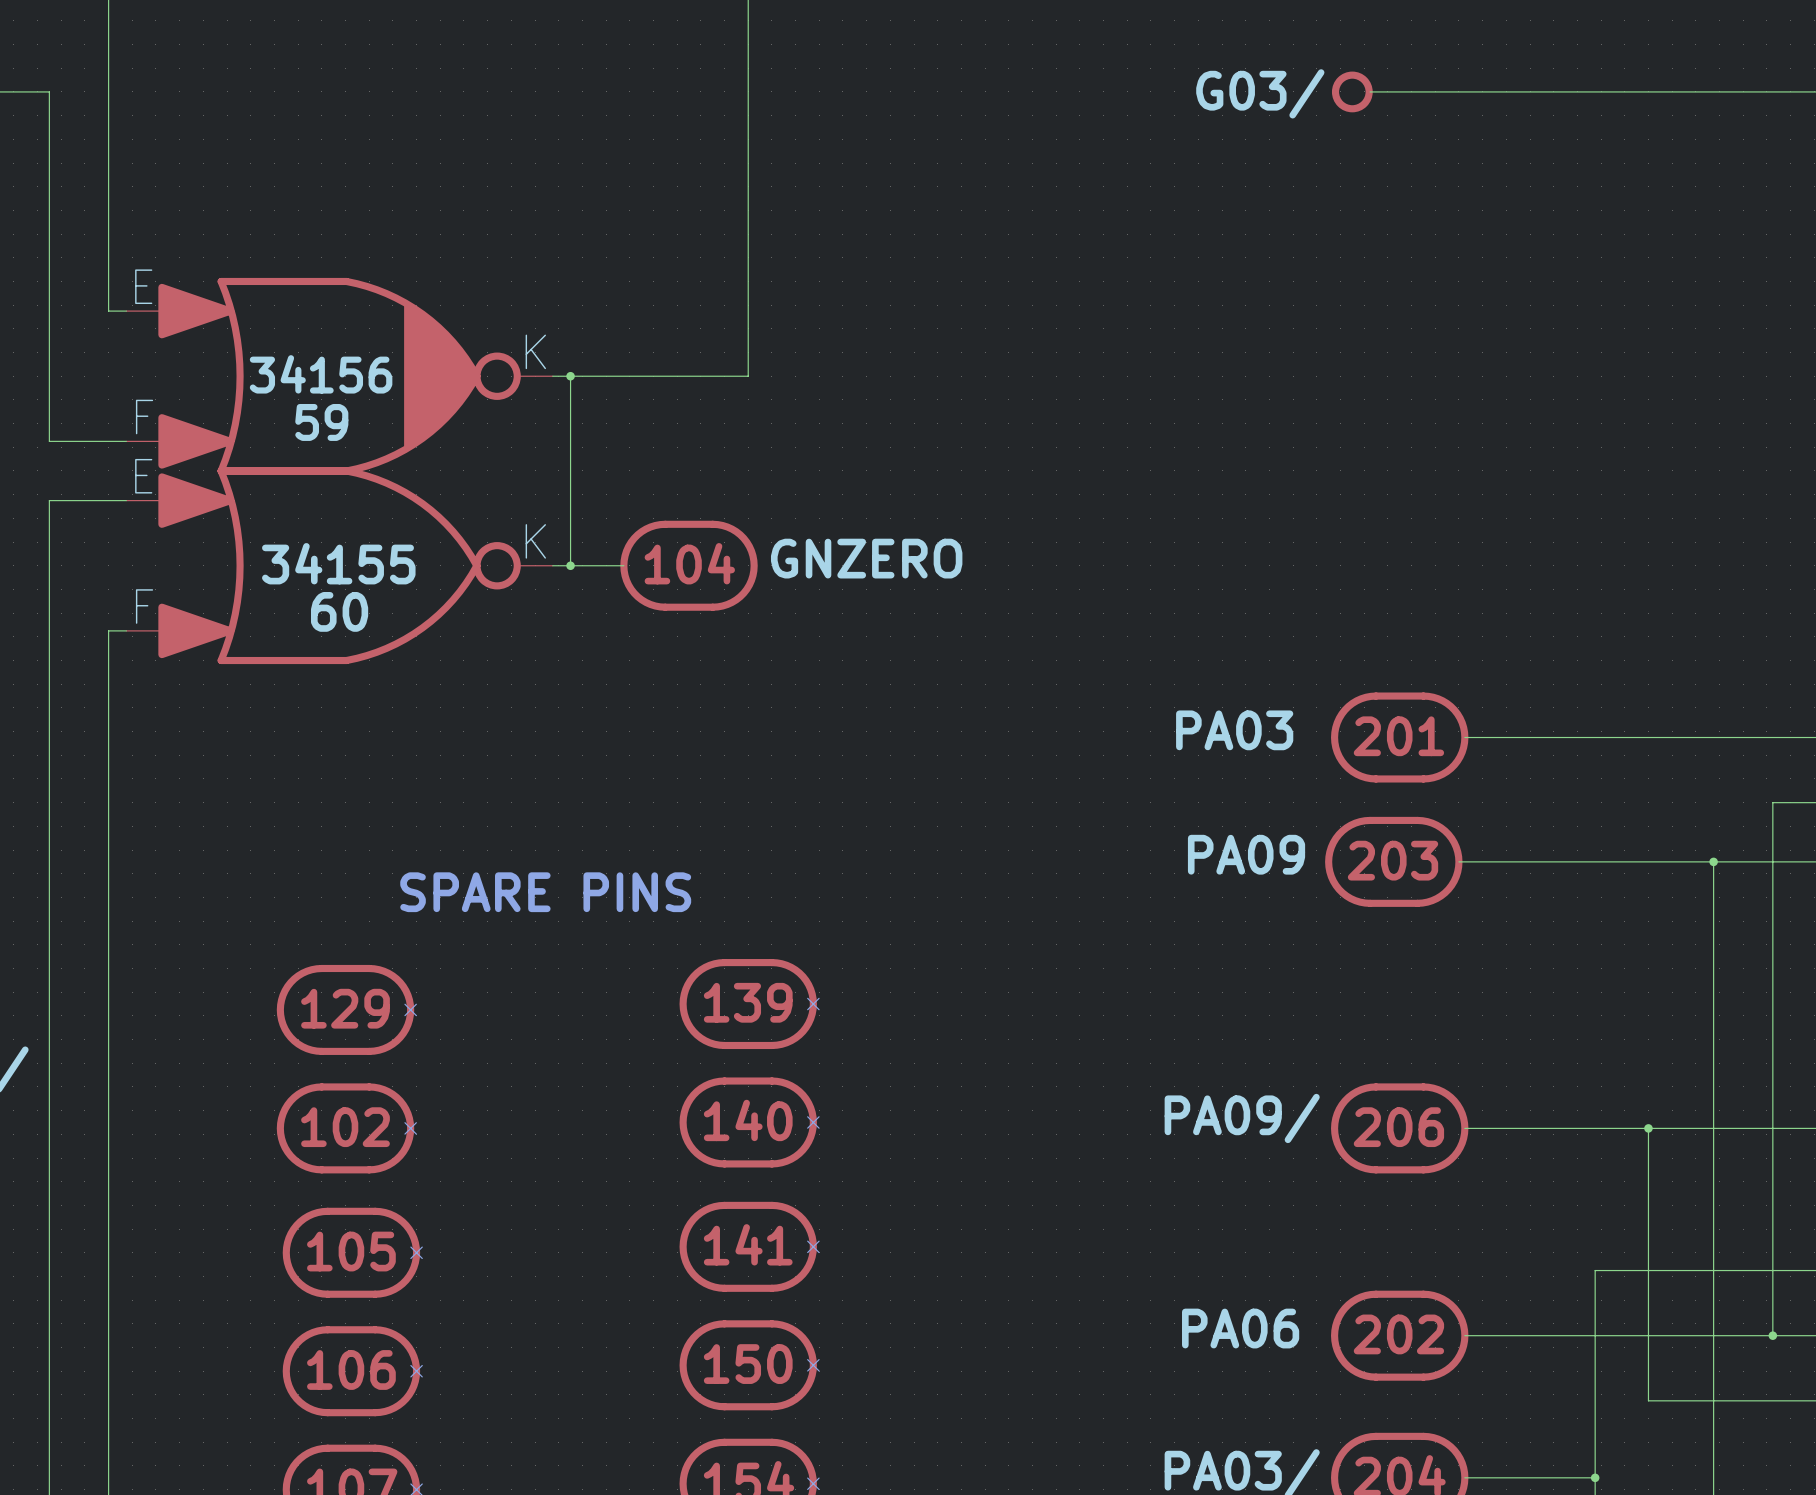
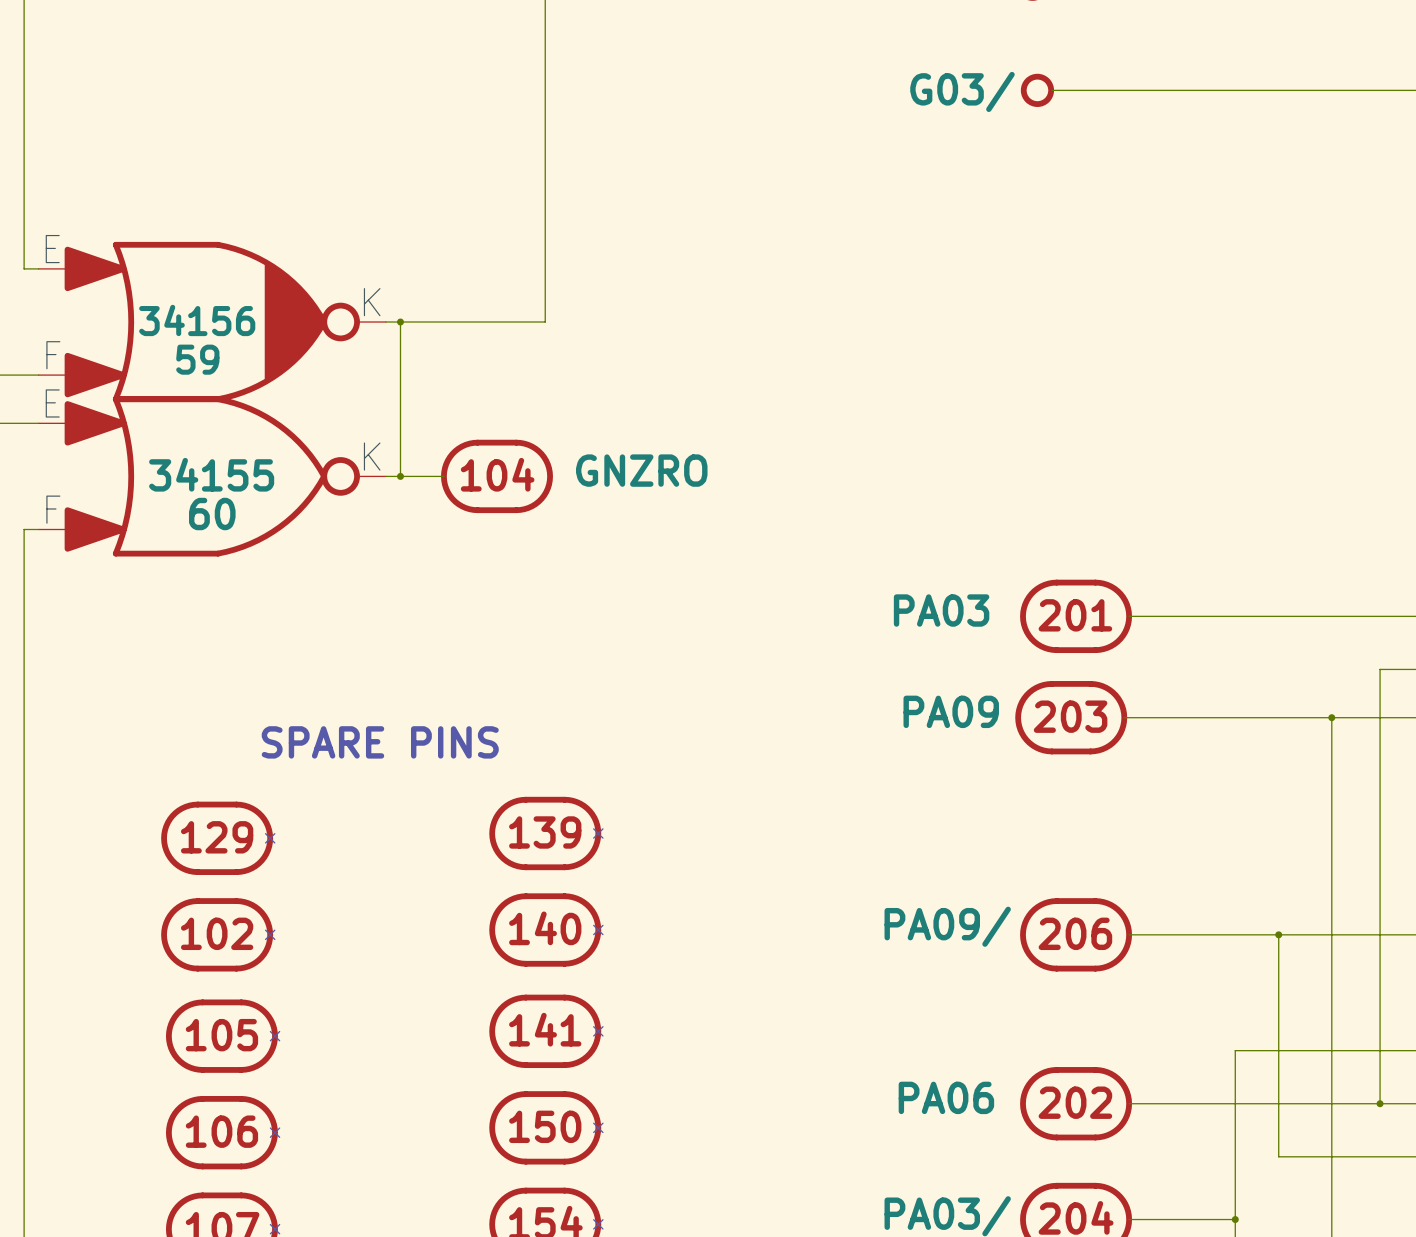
part text: GNZERO (866, 558) -> GNZRO (641, 470)

